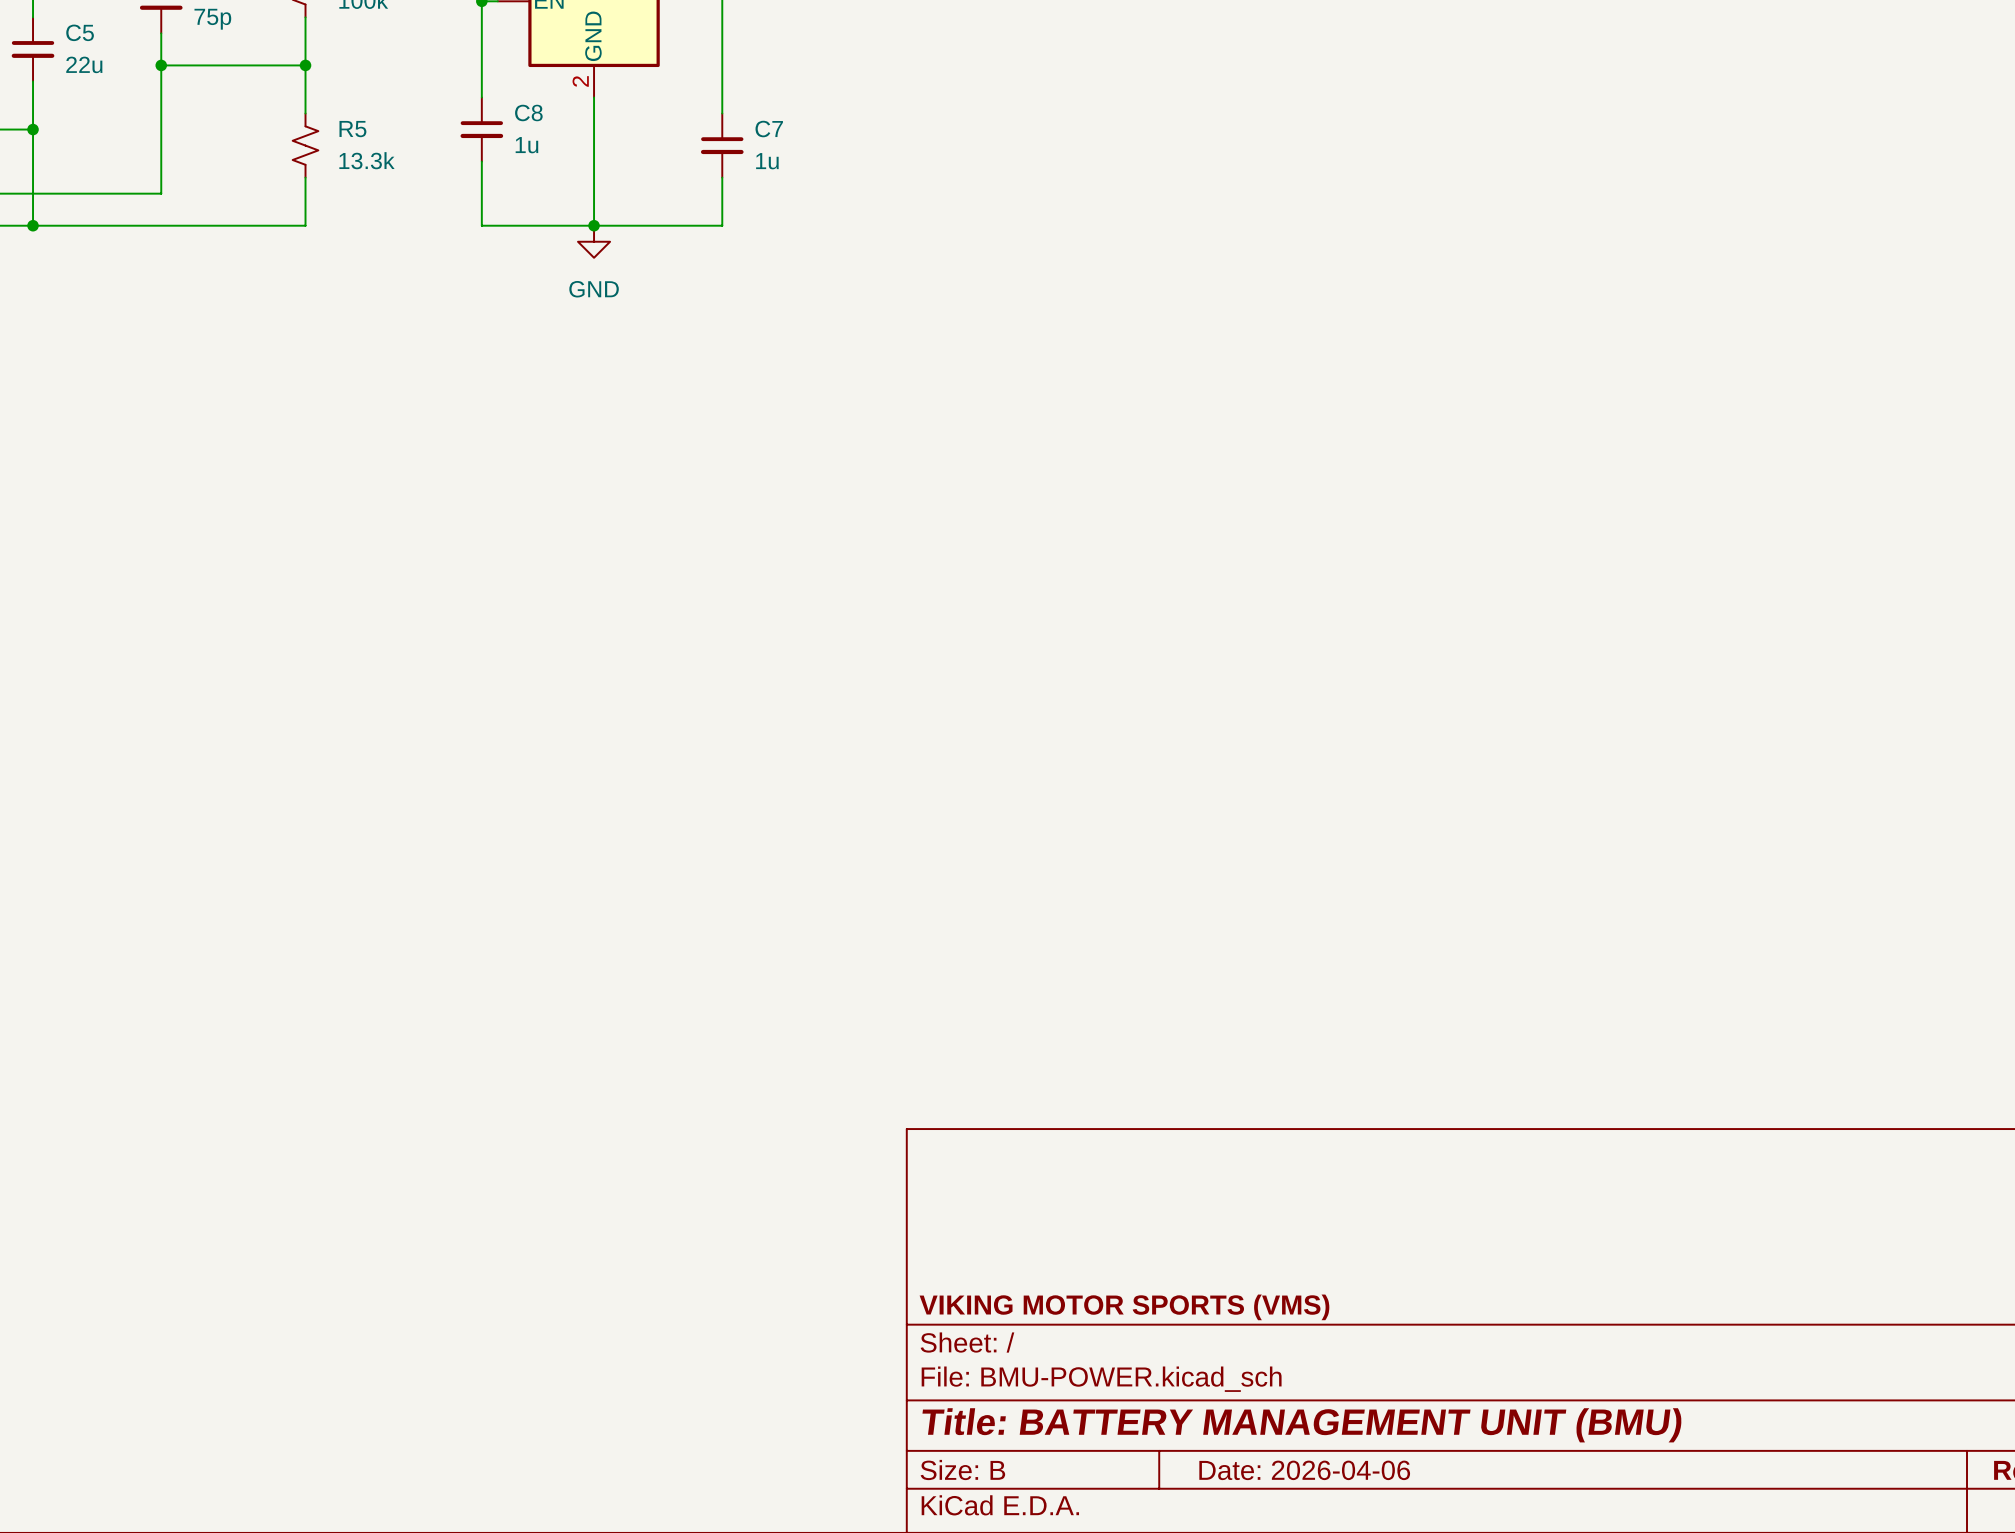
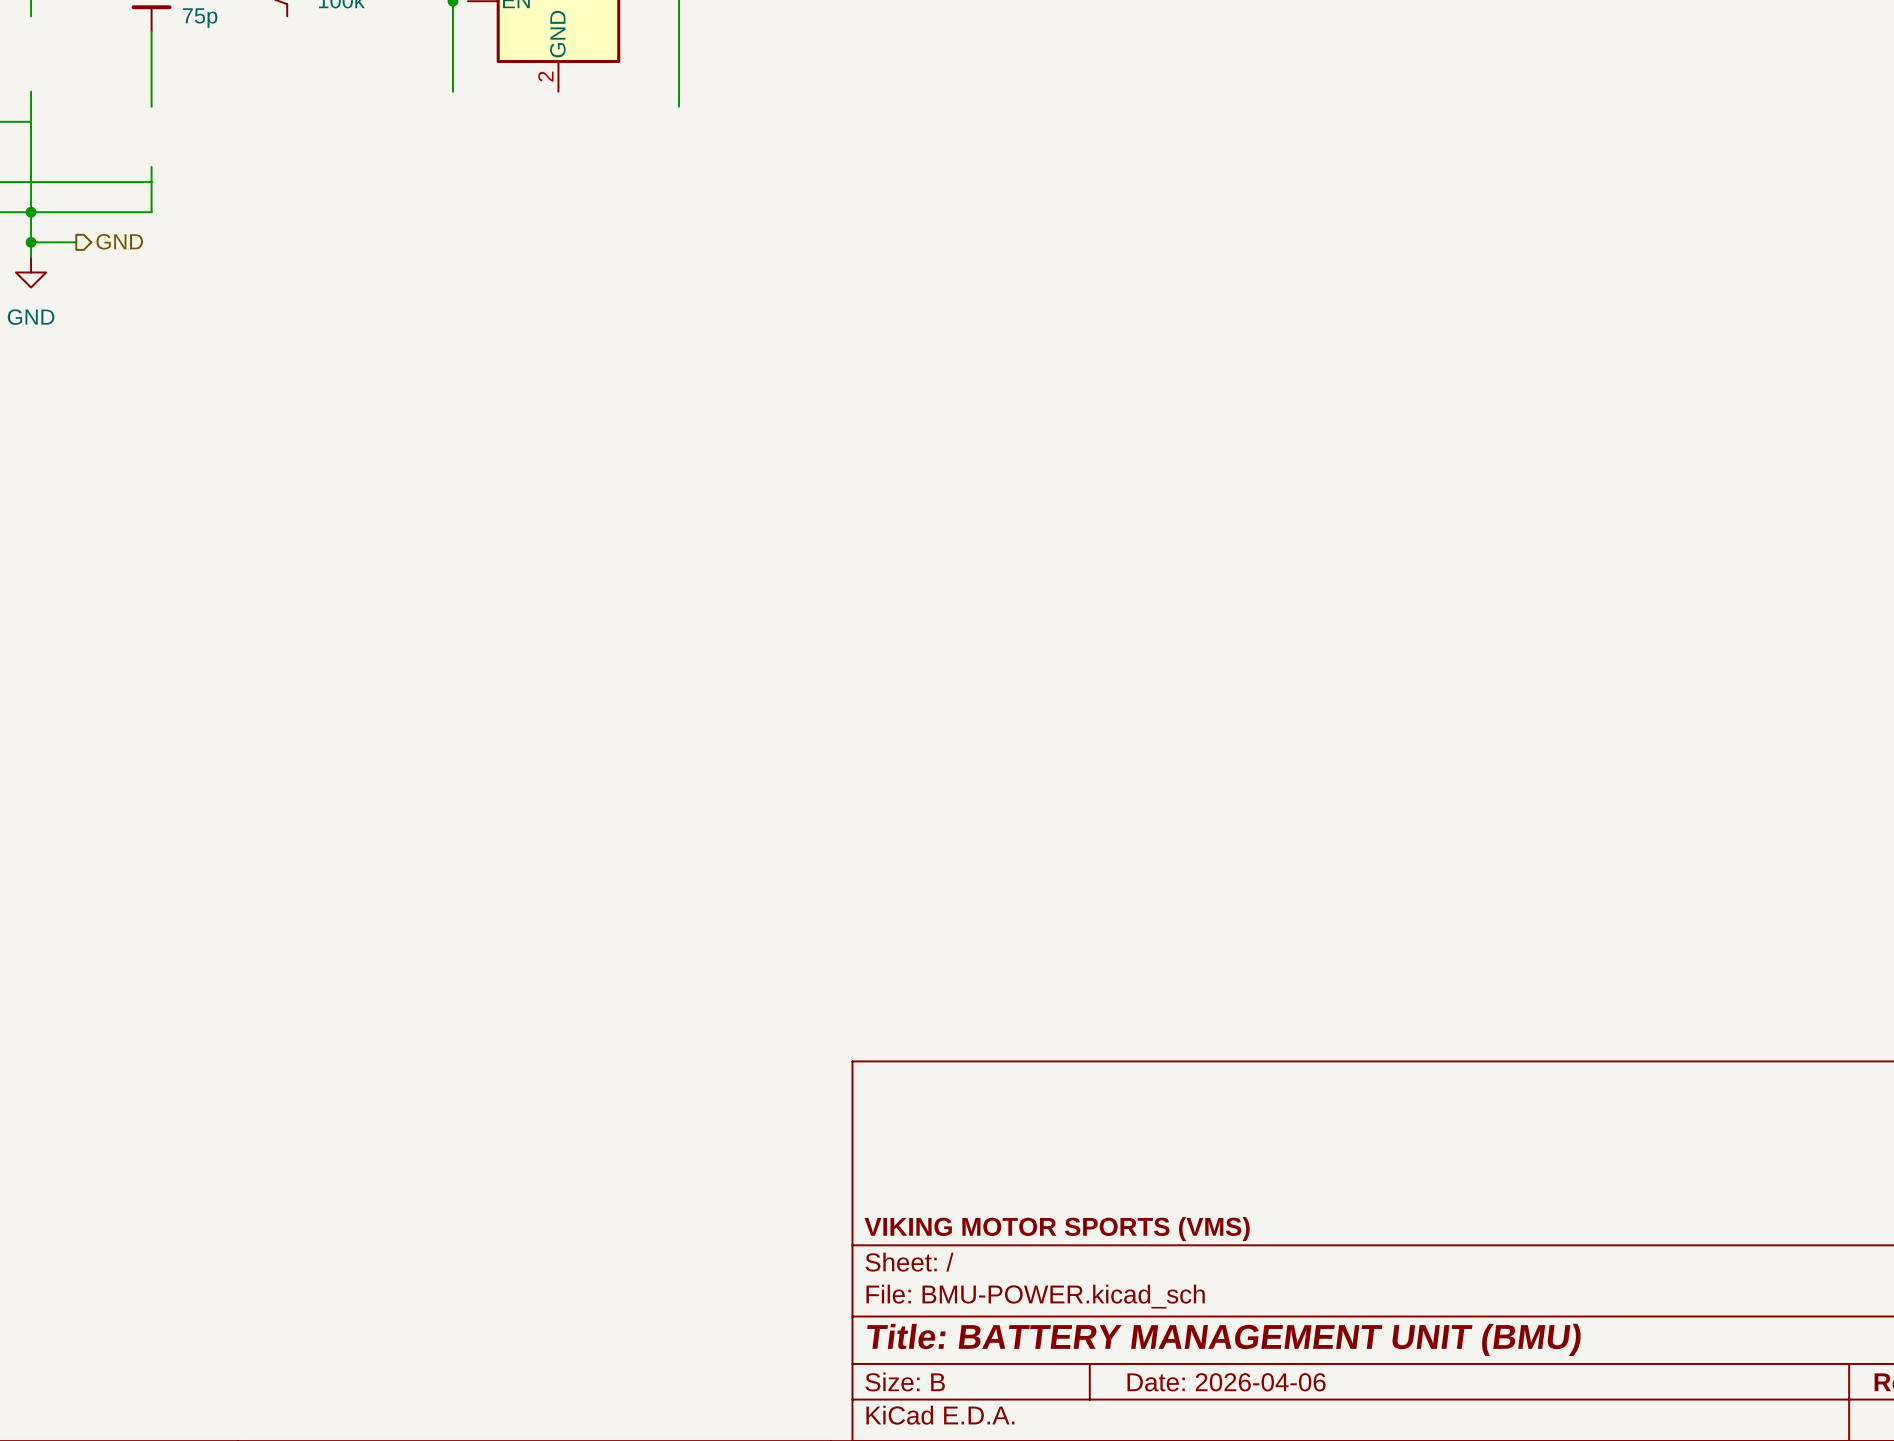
wire: (481, 1) (497, 1) -> none
wire: (305, 17) (305, 113) -> none
C5: 22u (33, 49) -> none
wire: (161, 65) (305, 65) -> none
junction: (161, 65) -> none
junction: (305, 65) -> none
wire: (33, 81) (33, 97) -> none
wire: (594, 97) (594, 225) -> none
wire: (161, 113) (161, 177) -> none
junction: (33, 129) -> none
C8: 1u (481, 129) -> none
R5: 13.3k (305, 145) -> none
C7: 1u (722, 145) -> none
wire: (481, 161) (481, 225) (722, 225) (722, 177) -> none
wire: (305, 177) (305, 225) (161, 225) -> (151, 182) (151, 212)
wire: none -> (31, 212) (31, 257)
junction: (594, 225) -> none
power symbol: GND (594, 241) -> none
wire: none -> (31, 242) (76, 242)
junction: none -> (31, 242)
hierarchical label: none -> GND (119, 241)
power symbol: none -> GND (31, 272)

